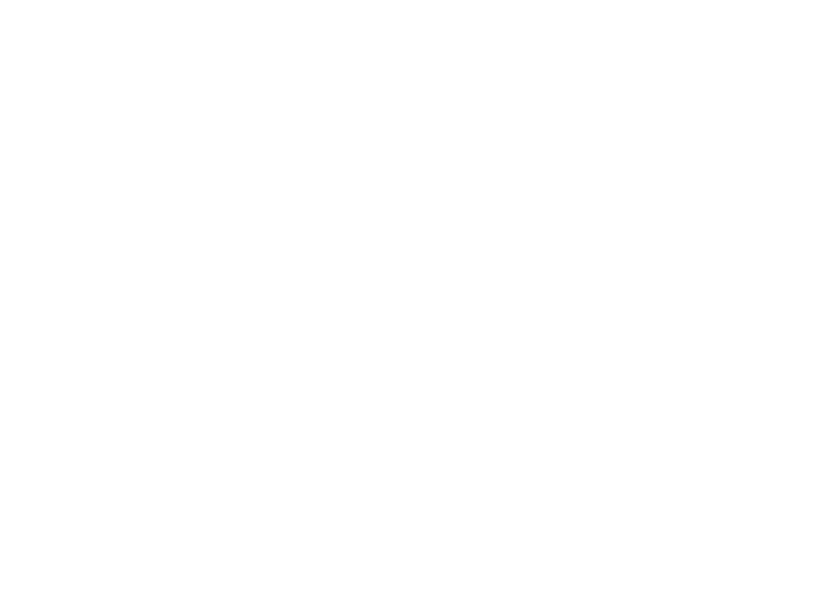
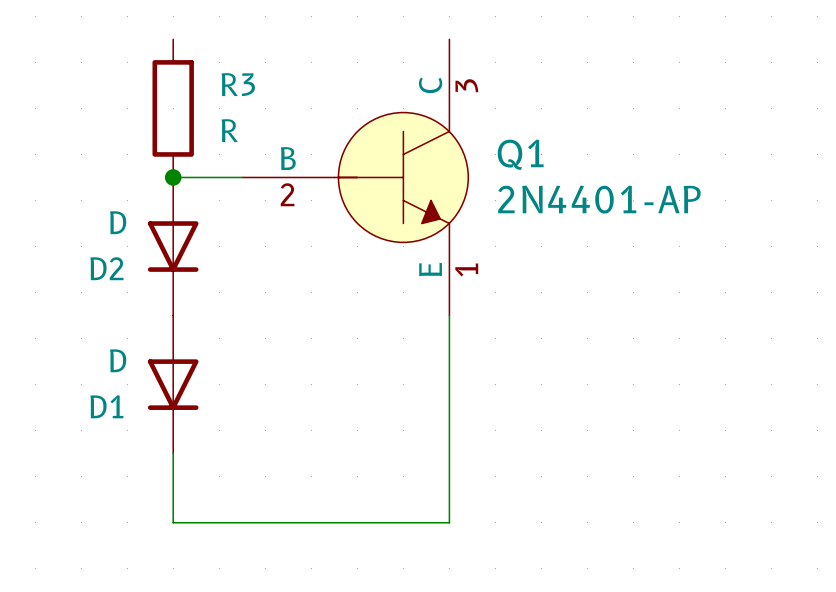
R3: none -> R (173, 108)
wire: none -> (173, 177) (242, 177)
junction: none -> (173, 177)
Q1: none -> 2N4401-AP (355, 177)
D2: none -> D (173, 246)
wire: none -> (449, 315) (449, 522) (173, 522) (173, 453)
D1: none -> D (173, 384)

